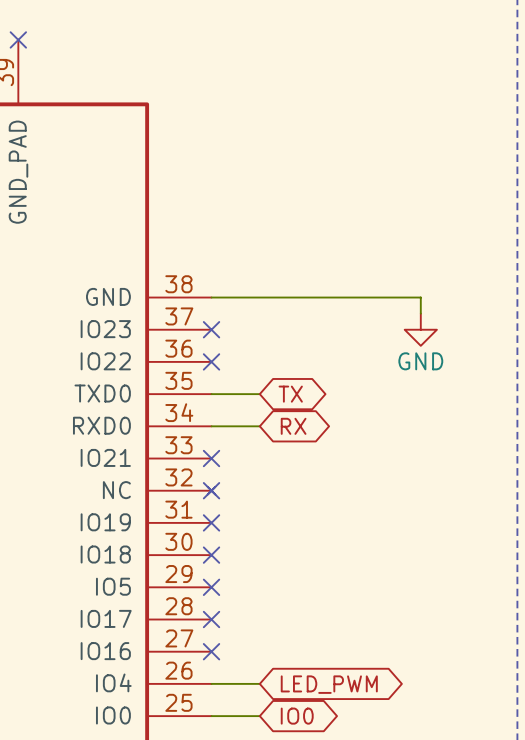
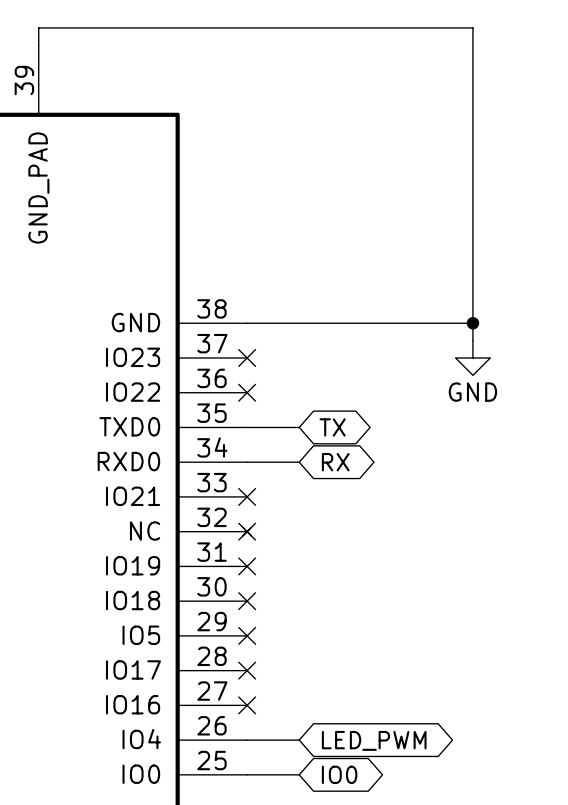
wire: none -> (38, 45) (38, 27) (472, 27) (472, 323)
no-connect mark: (18, 39) -> none
junction: none -> (472, 323)

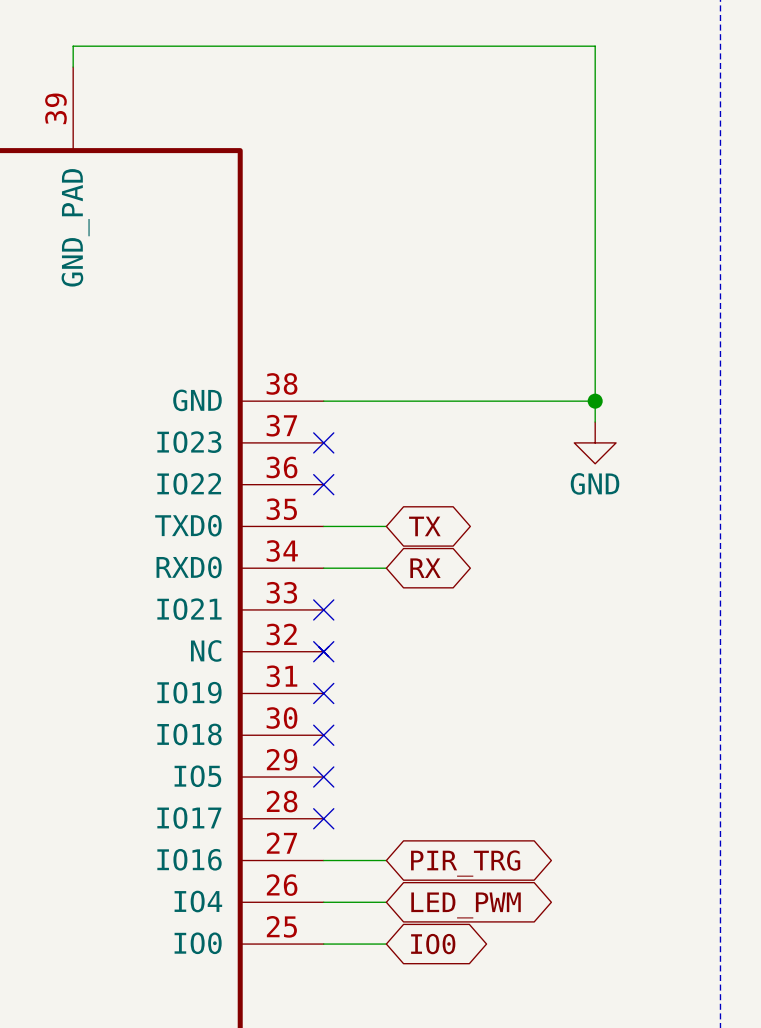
wire: none -> (323, 860) (386, 860)
no-connect mark: (247, 705) -> none
global label: none -> PIR_TRG (465, 863)

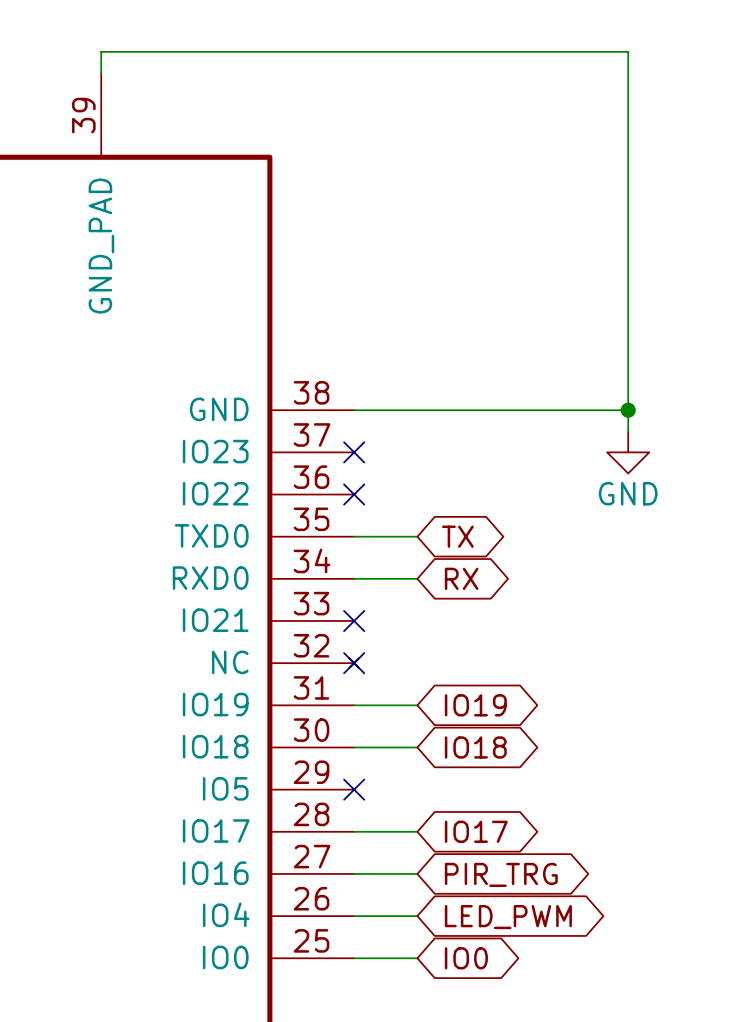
wire: none -> (354, 705) (417, 705)
no-connect mark: (323, 693) -> none
global label: none -> IO19 (475, 705)
wire: none -> (354, 747) (417, 747)
no-connect mark: (323, 735) -> none
global label: none -> IO18 (475, 747)
wire: none -> (354, 831) (417, 831)
no-connect mark: (323, 818) -> none
global label: none -> IO17 (476, 831)

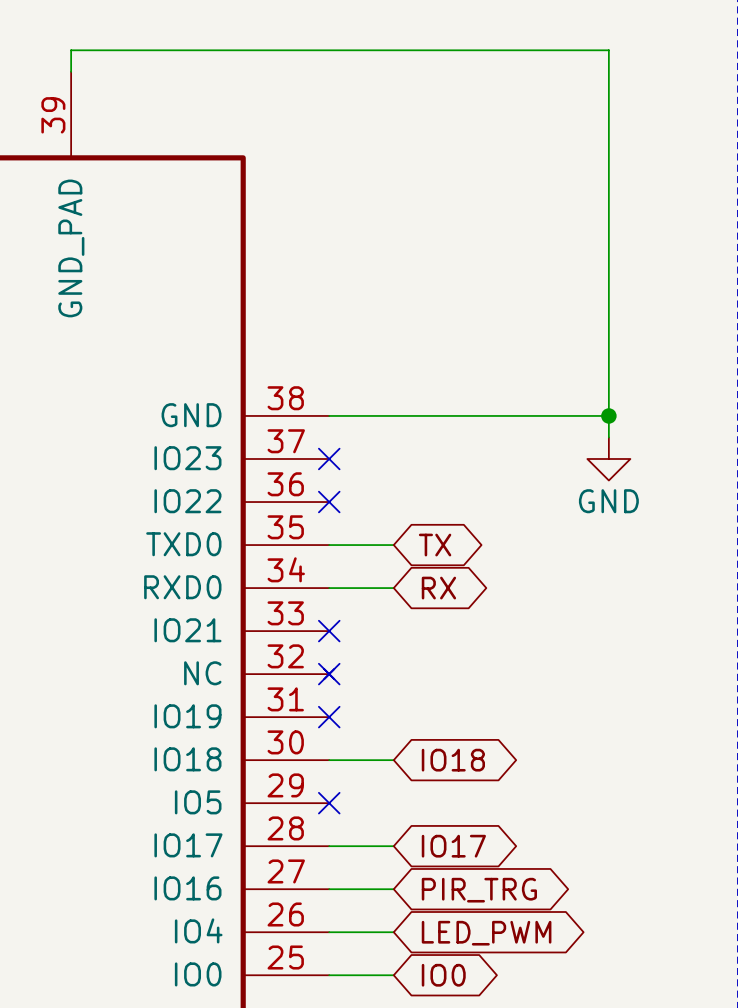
wire: (354, 705) (417, 705) -> none
no-connect mark: none -> (329, 717)
global label: IO19 (475, 705) -> none

